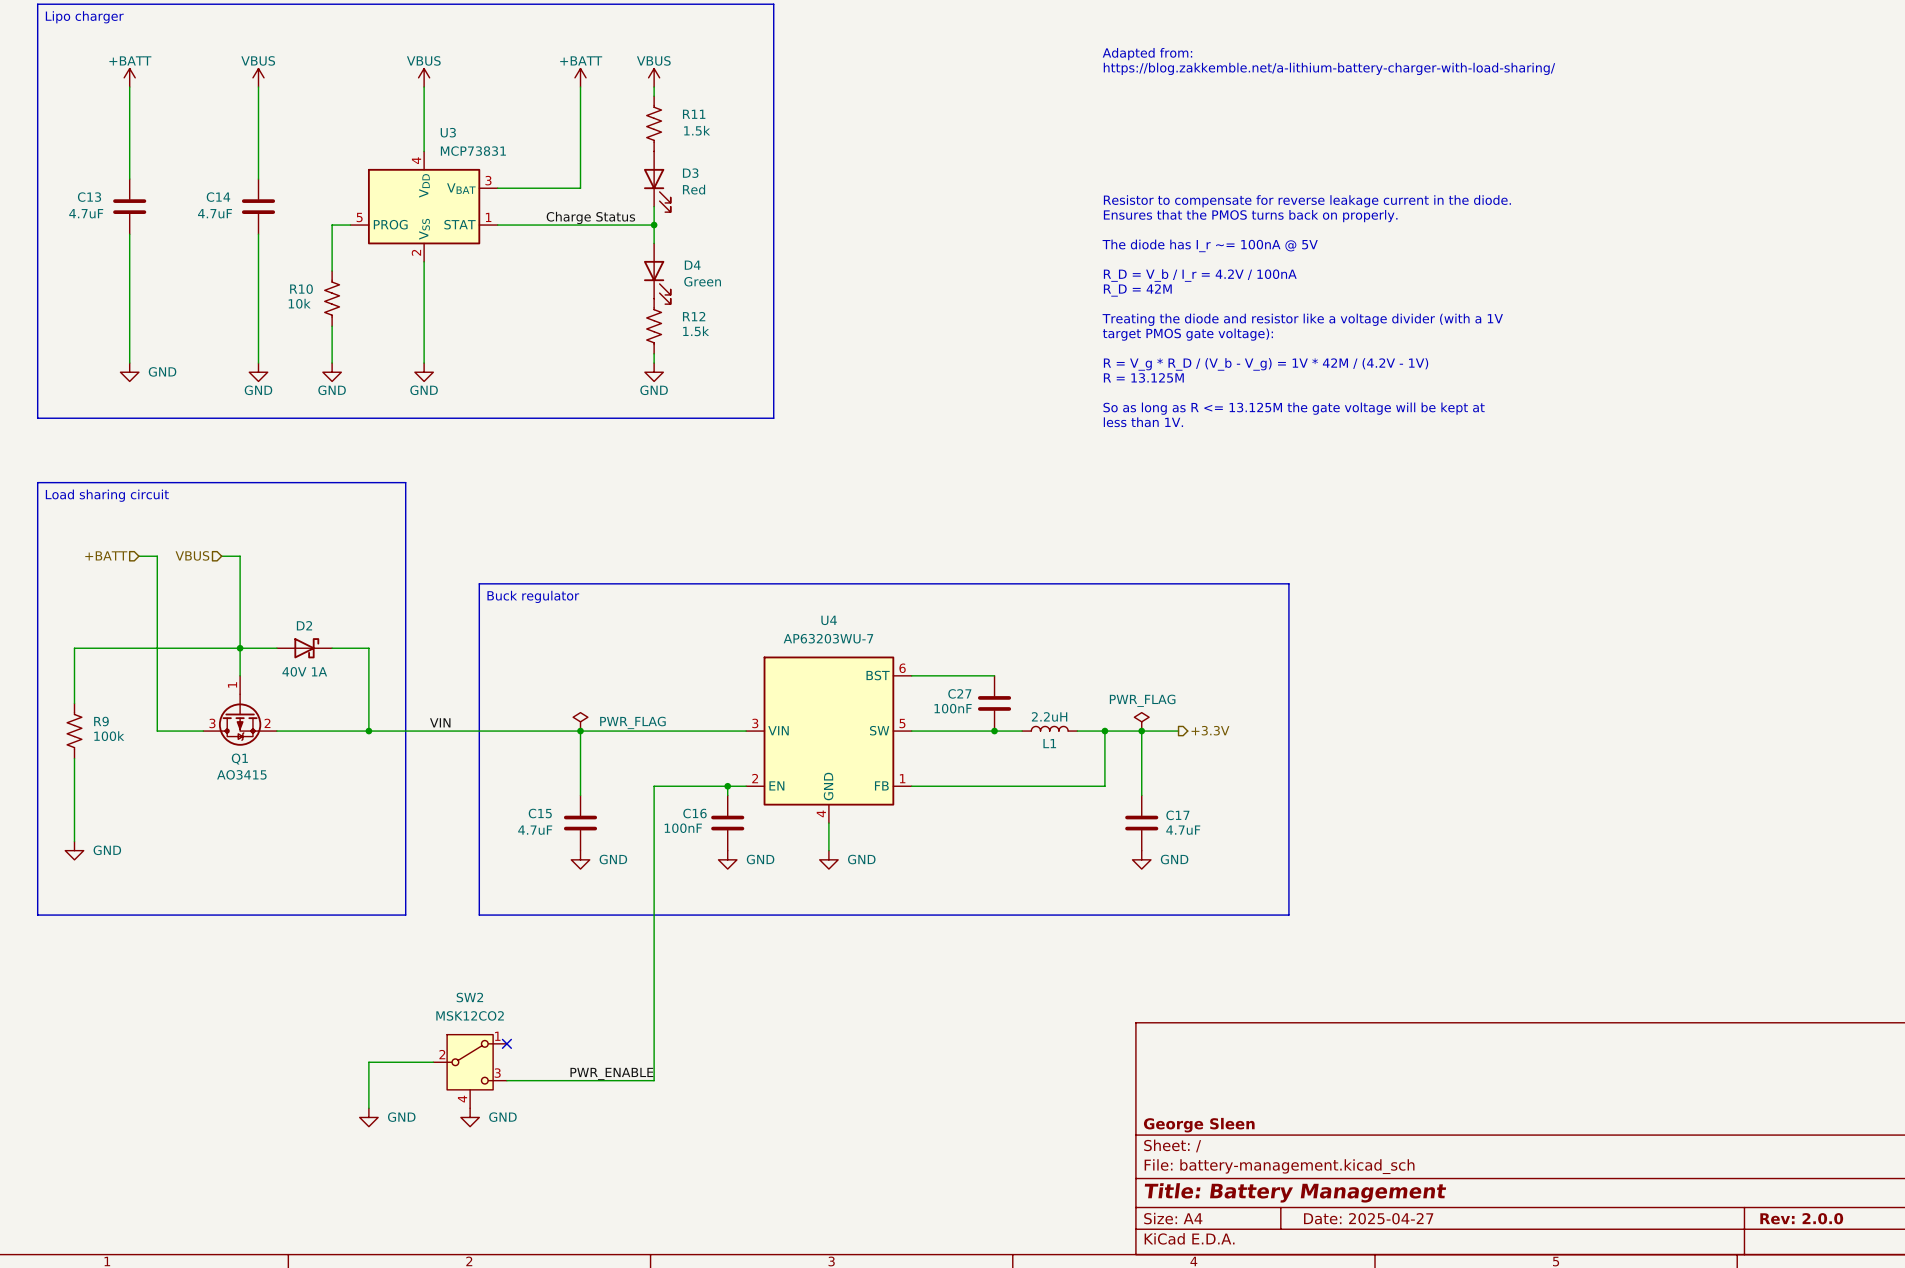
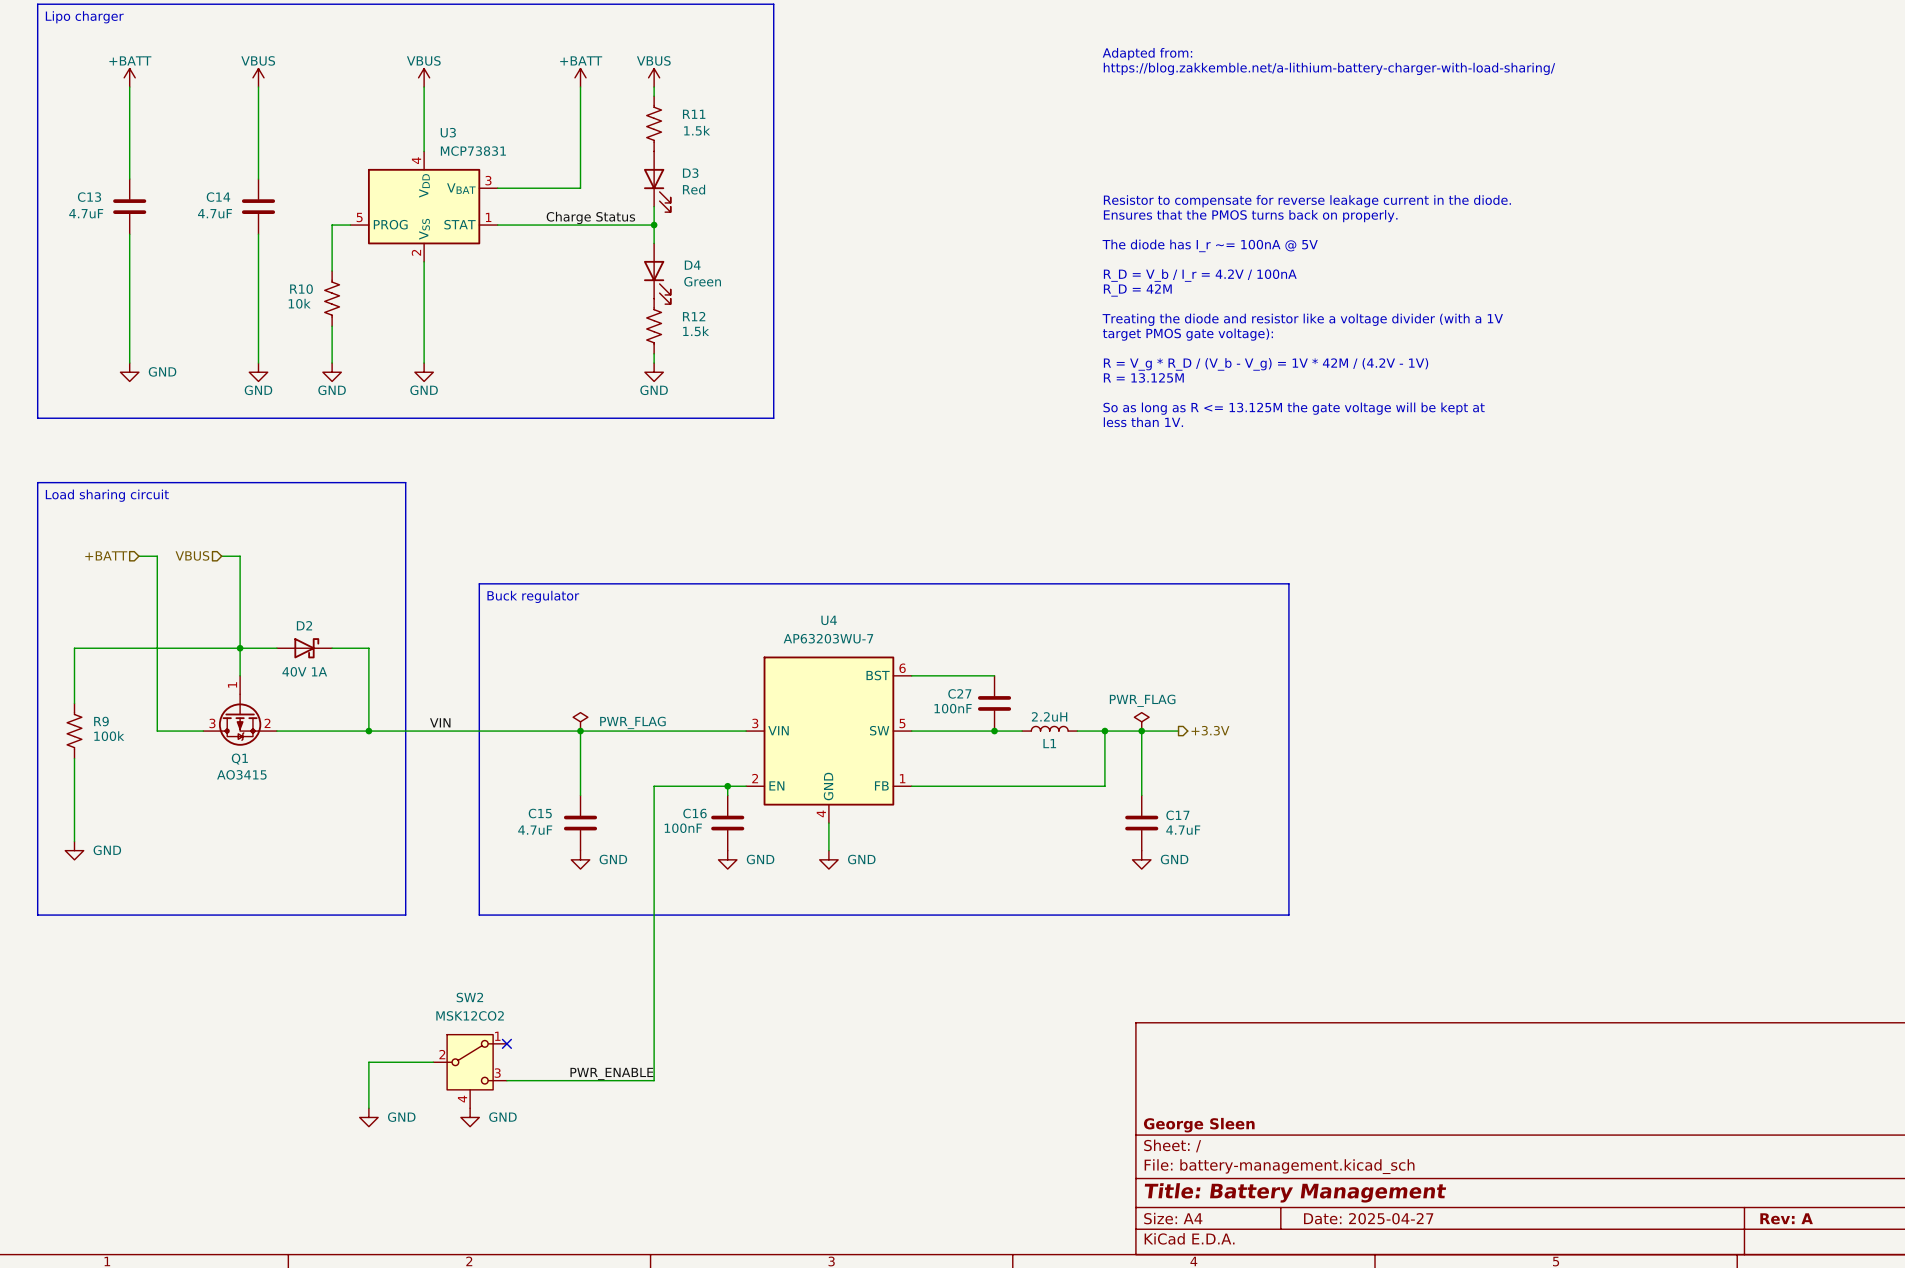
title block: Rev: 2.0.0 (1801, 1218) -> Rev: A (1786, 1218)

